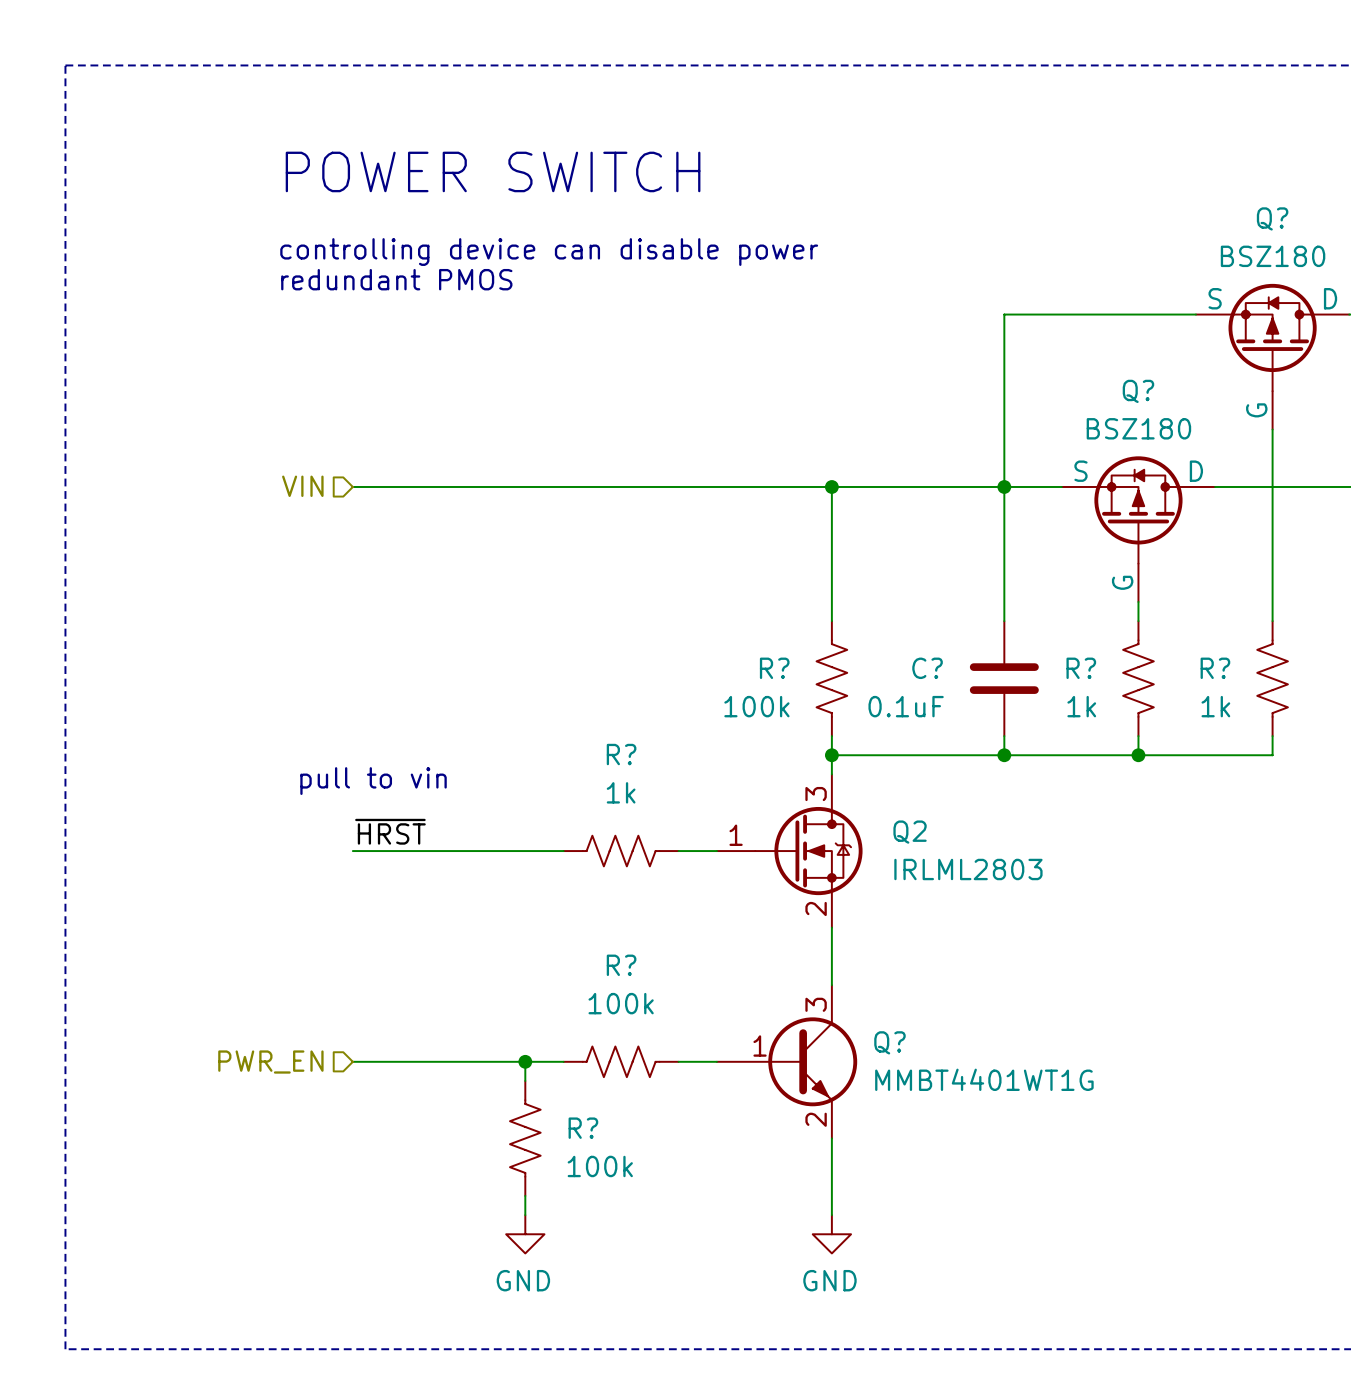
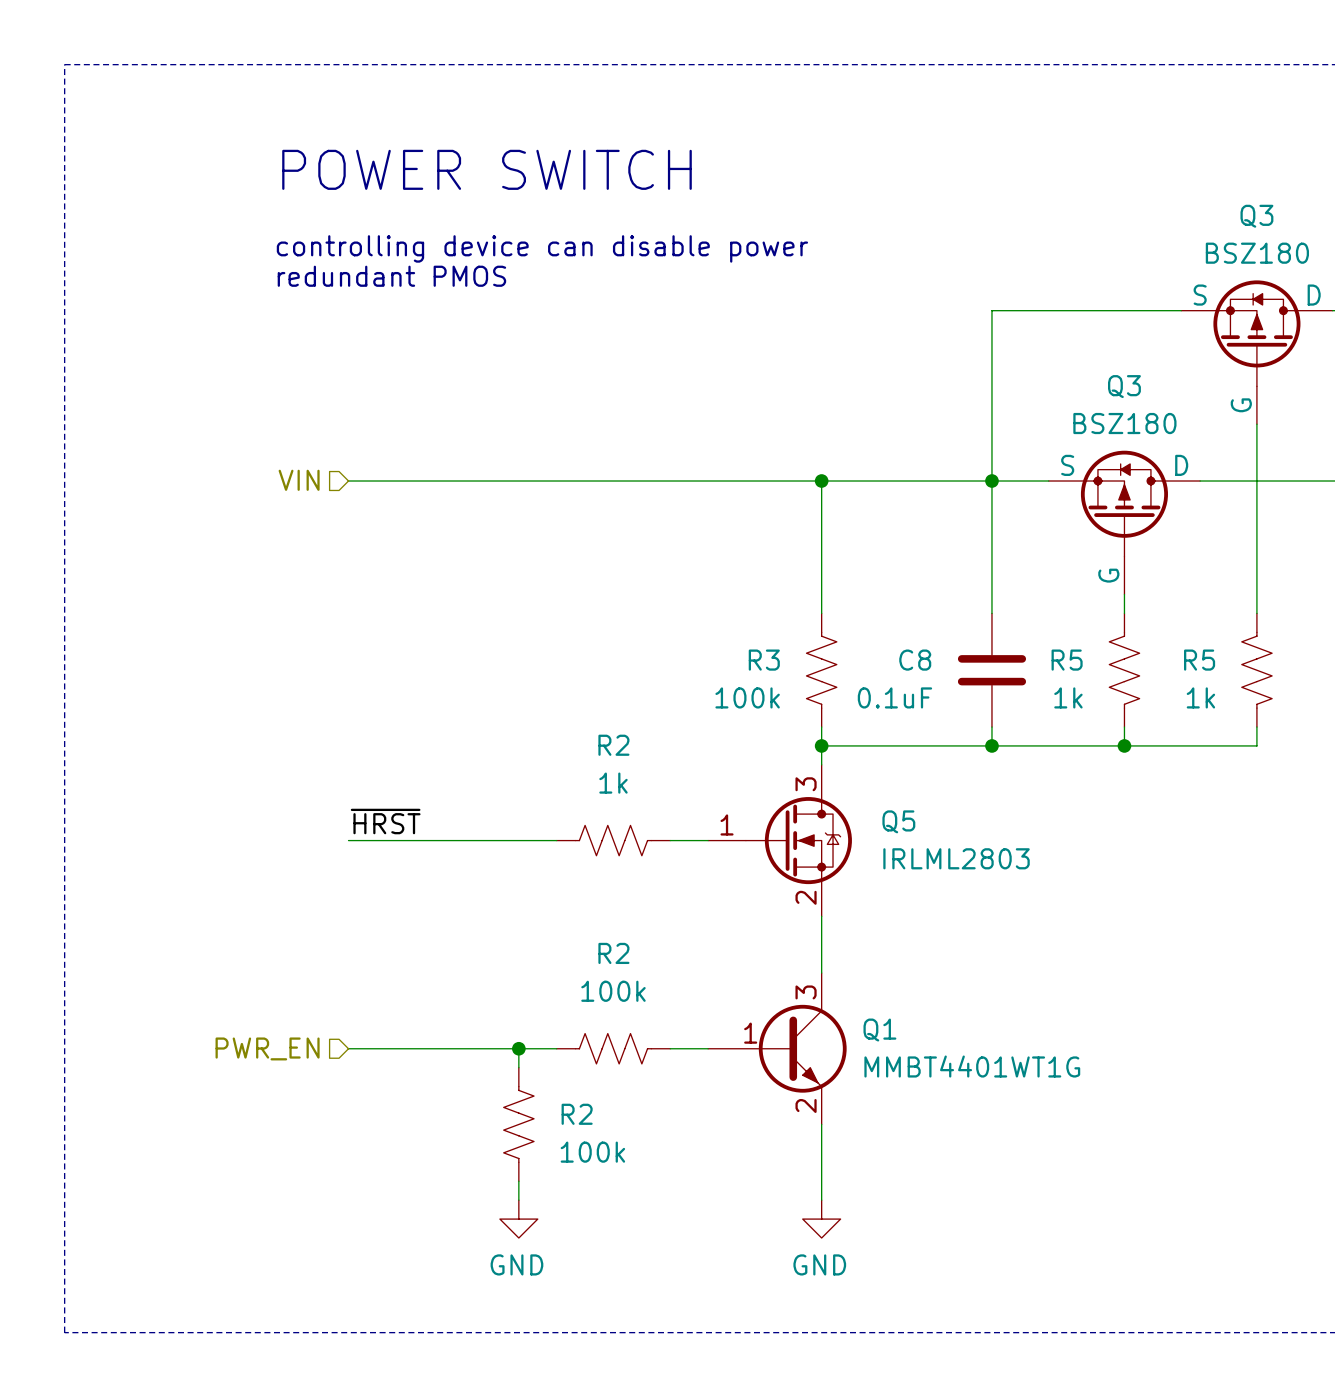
Q? name: Q? (1272, 218) -> Q3 (1256, 216)
Q? name: Q? (1138, 391) -> Q3 (1124, 386)
R? name: R? (774, 668) -> R3 (764, 660)
C? name: C? (927, 668) -> C8 (915, 660)
R? name: R? (1081, 668) -> R5 (1067, 660)
R? name: R? (1215, 668) -> R5 (1199, 660)
R? name: R? (621, 754) -> R2 (613, 745)
text: pull to vin (373, 781) -> none
Q2 name: Q2 (910, 832) -> Q5 (898, 821)
R? name: R? (621, 965) -> R2 (613, 953)
Q? name: Q? (889, 1042) -> Q1 (879, 1030)
R? name: R? (583, 1128) -> R2 (577, 1114)

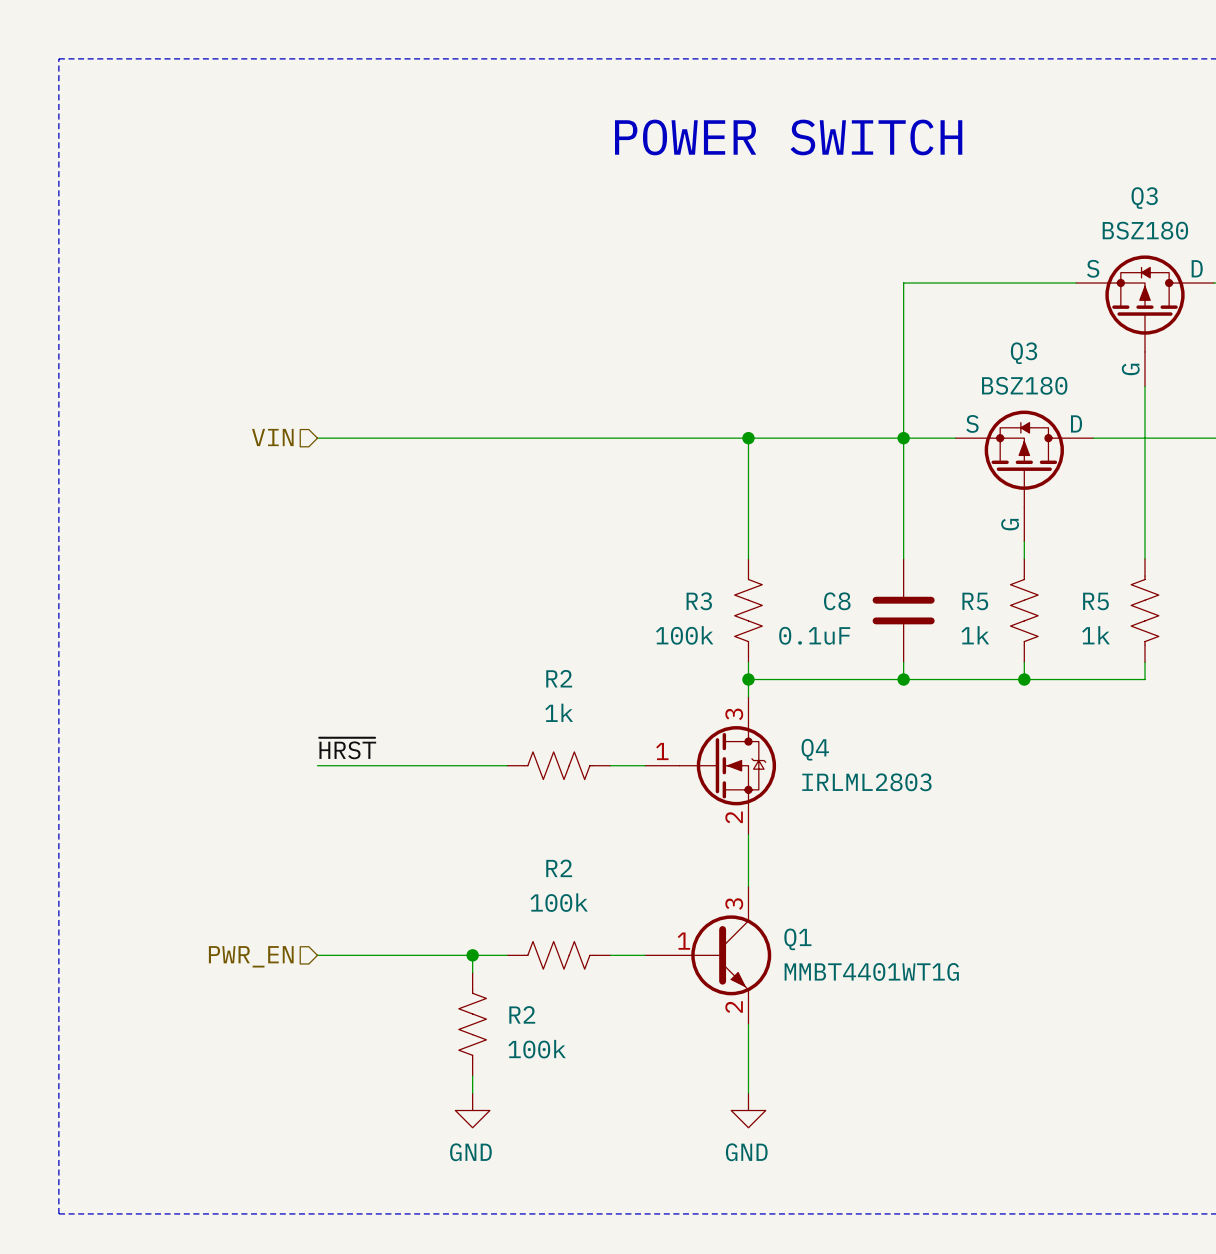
text: none -> POWER SWITCH (788, 137)
text: POWER SWITCH (487, 169) -> none
text: controlling device can disable power (542, 248) -> none
text: redundant PMOS (391, 276) -> none
Q5 name: Q5 (898, 821) -> Q4 (815, 749)

